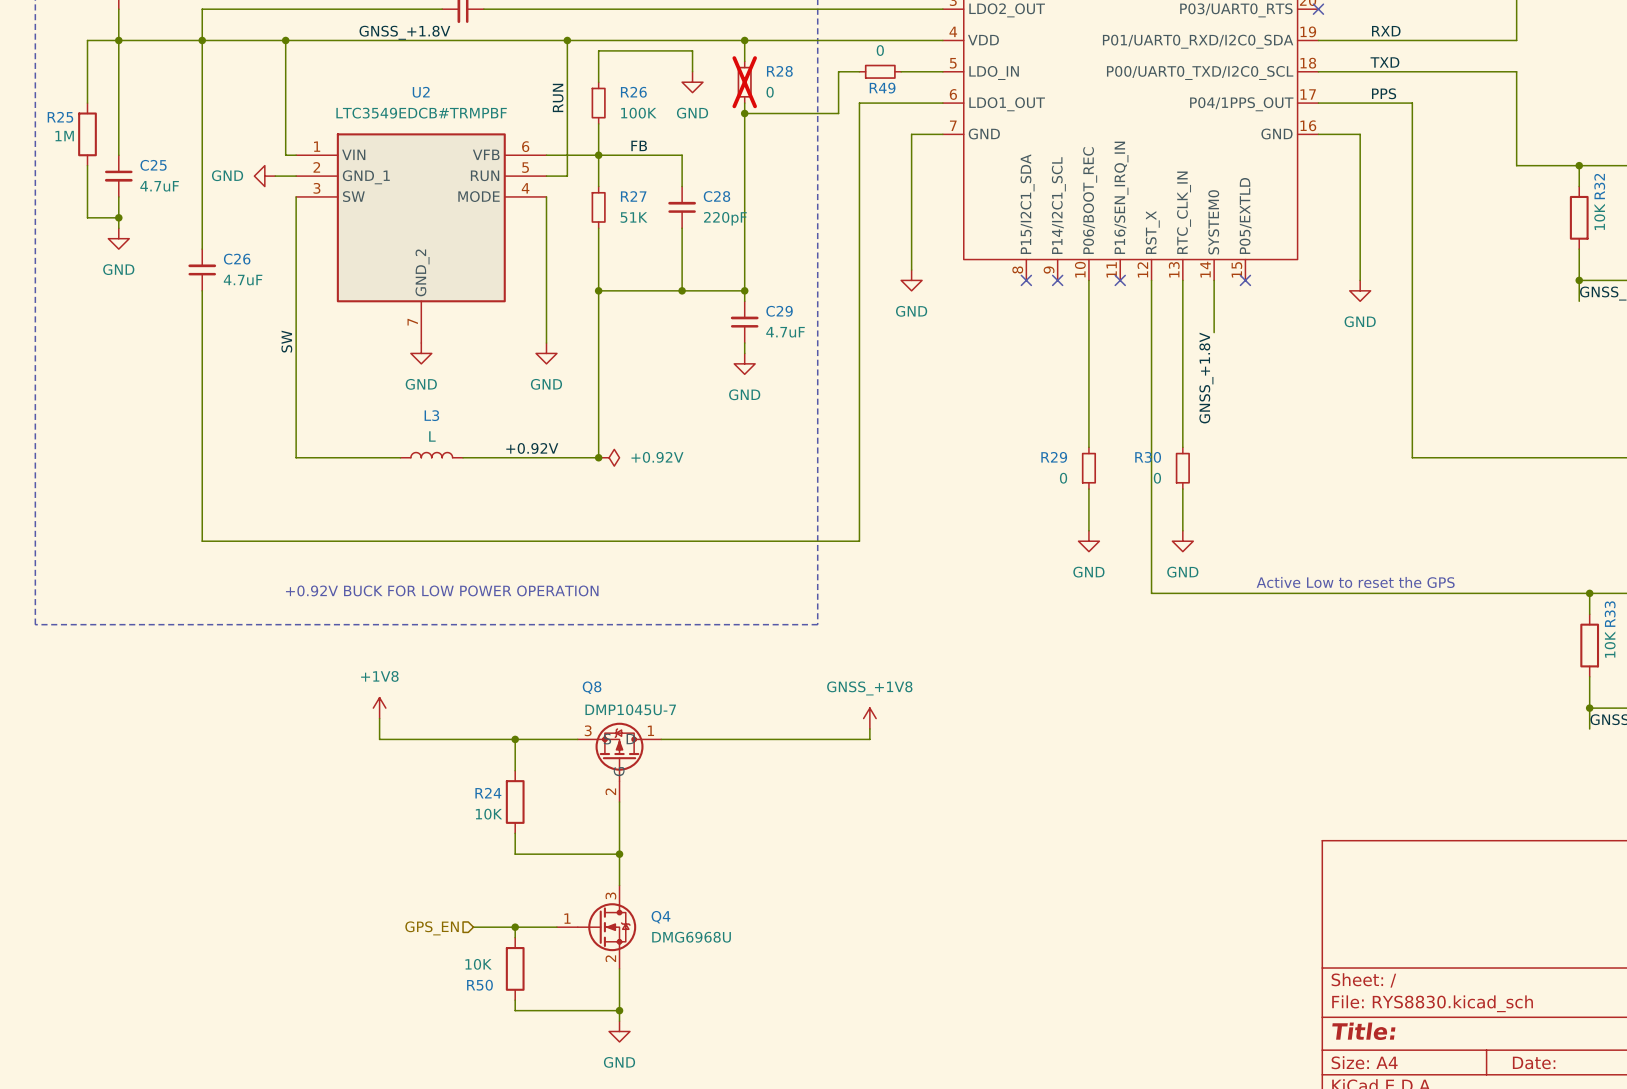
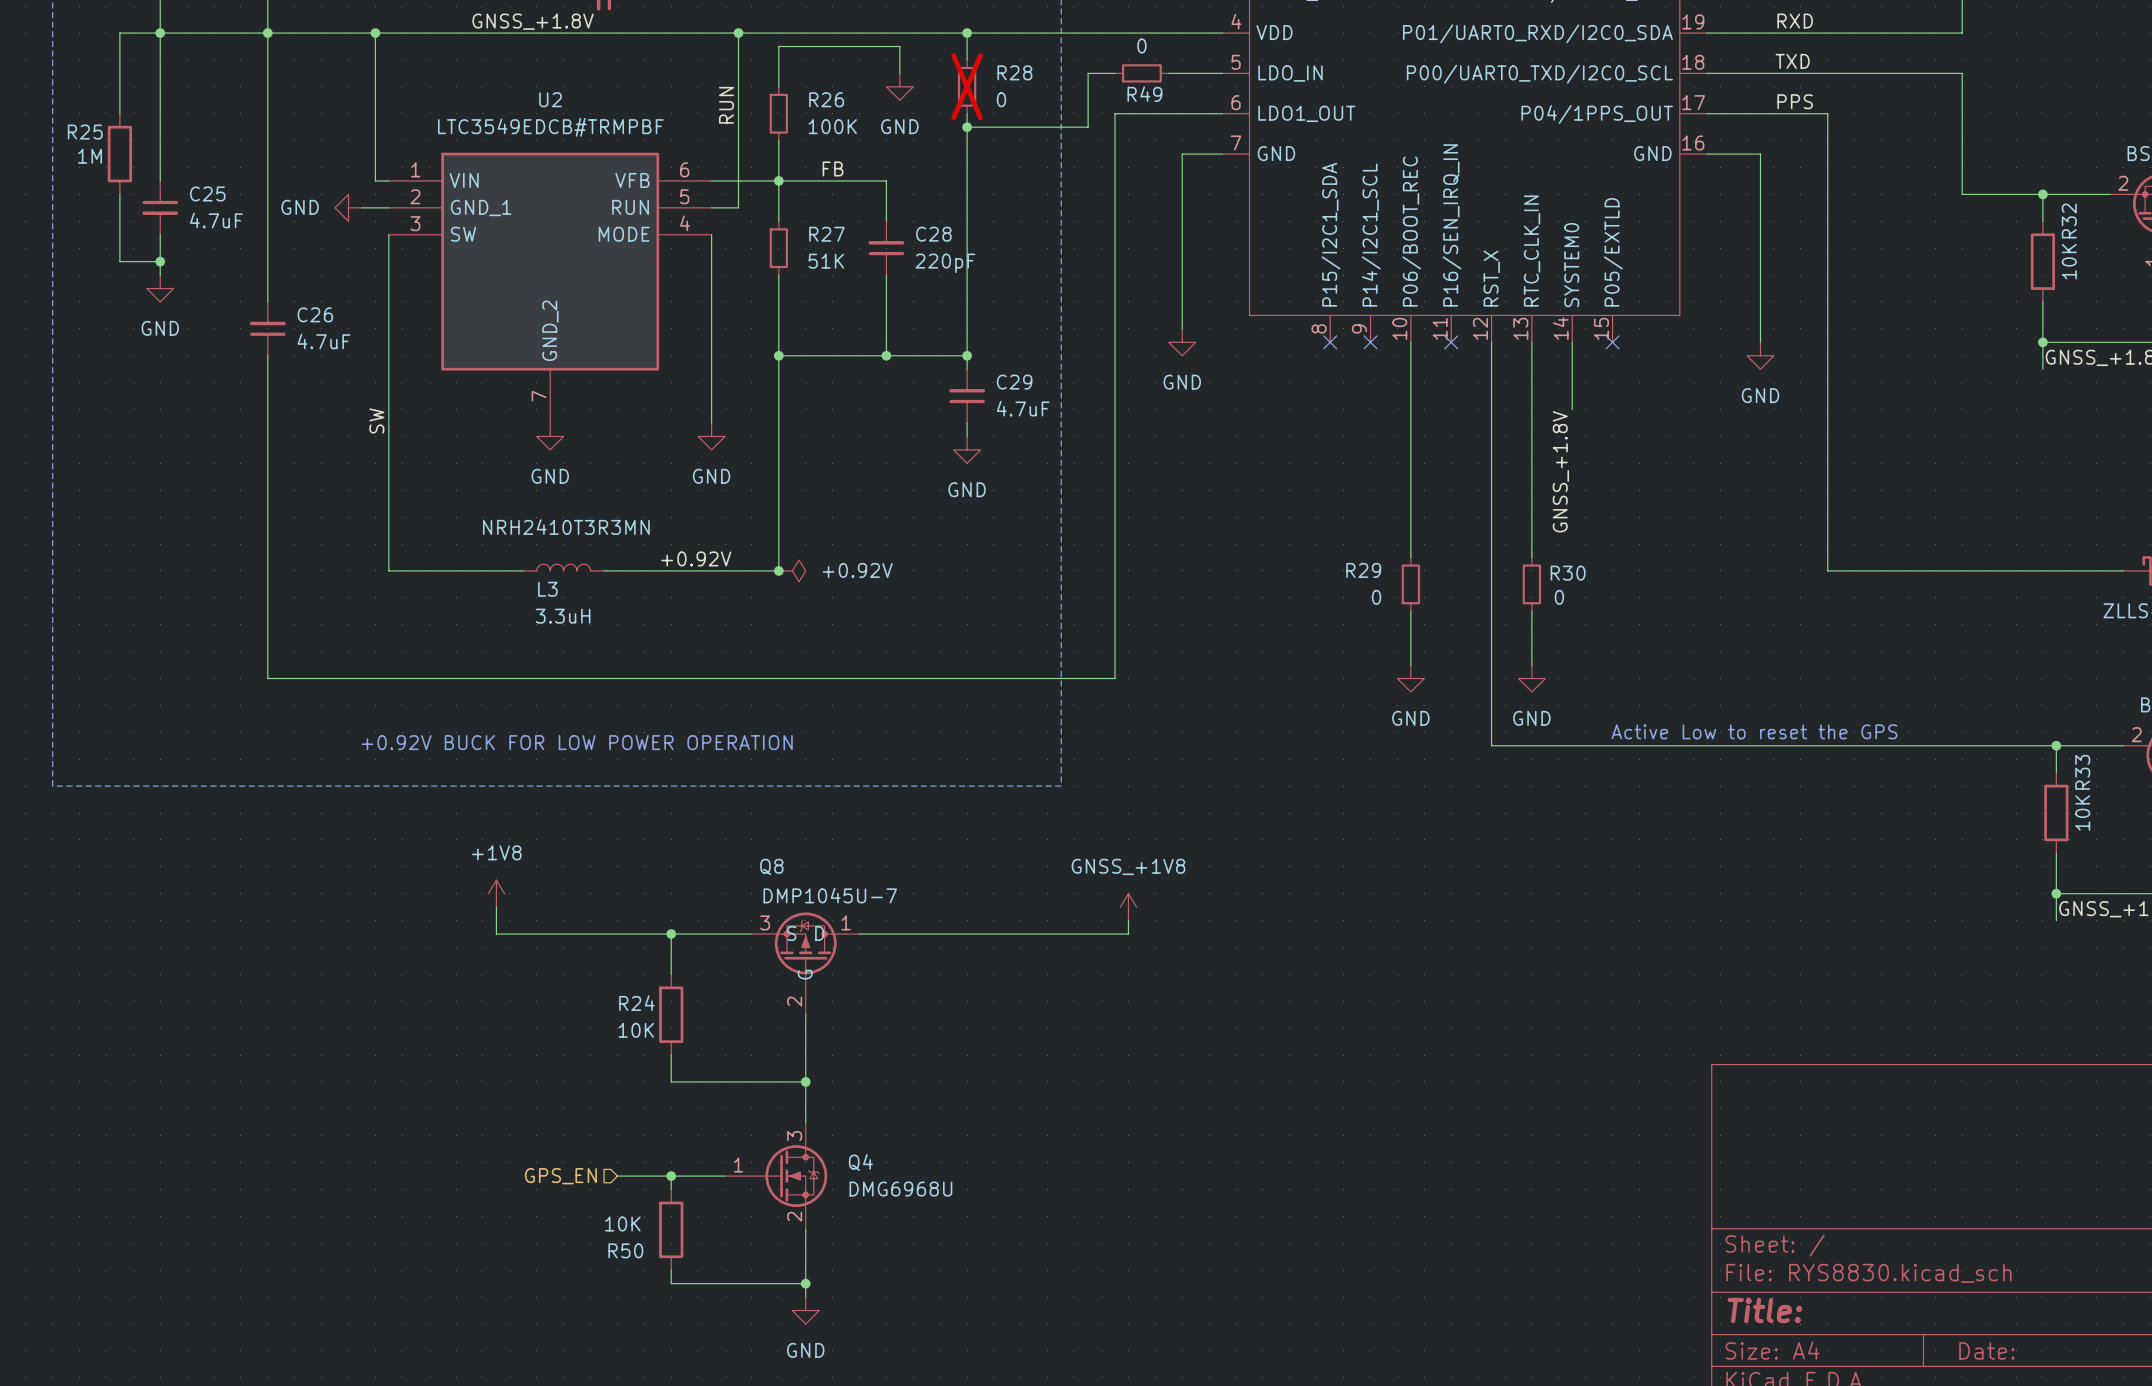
L3 name position: L3 (431, 415) -> L3 (547, 589)
L3 text: none -> NRH2410T3R3MN (566, 527)
L3 value: L (432, 436) -> 3.3uH (563, 616)
R30 name position: R30 (1148, 457) -> R30 (1568, 573)
R30 value position: 0 (1157, 478) -> 0 (1559, 597)

